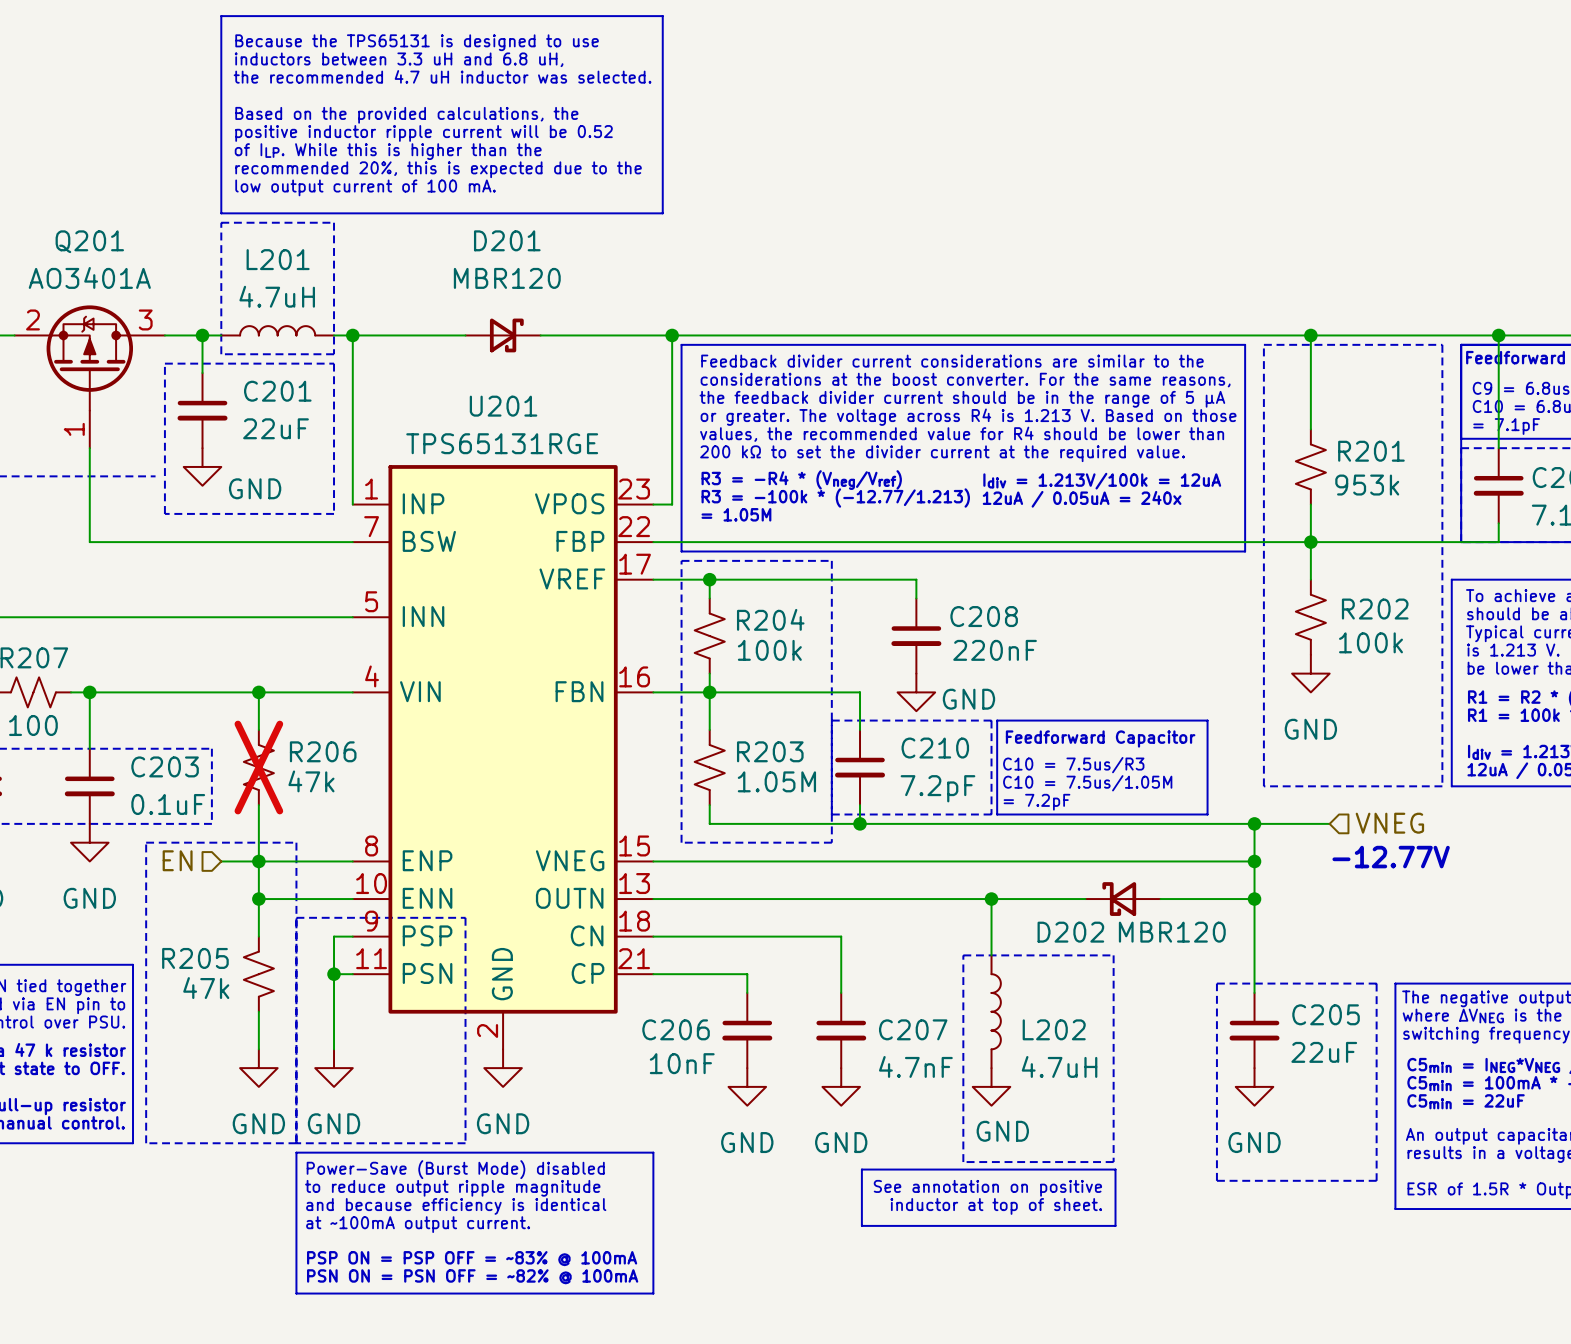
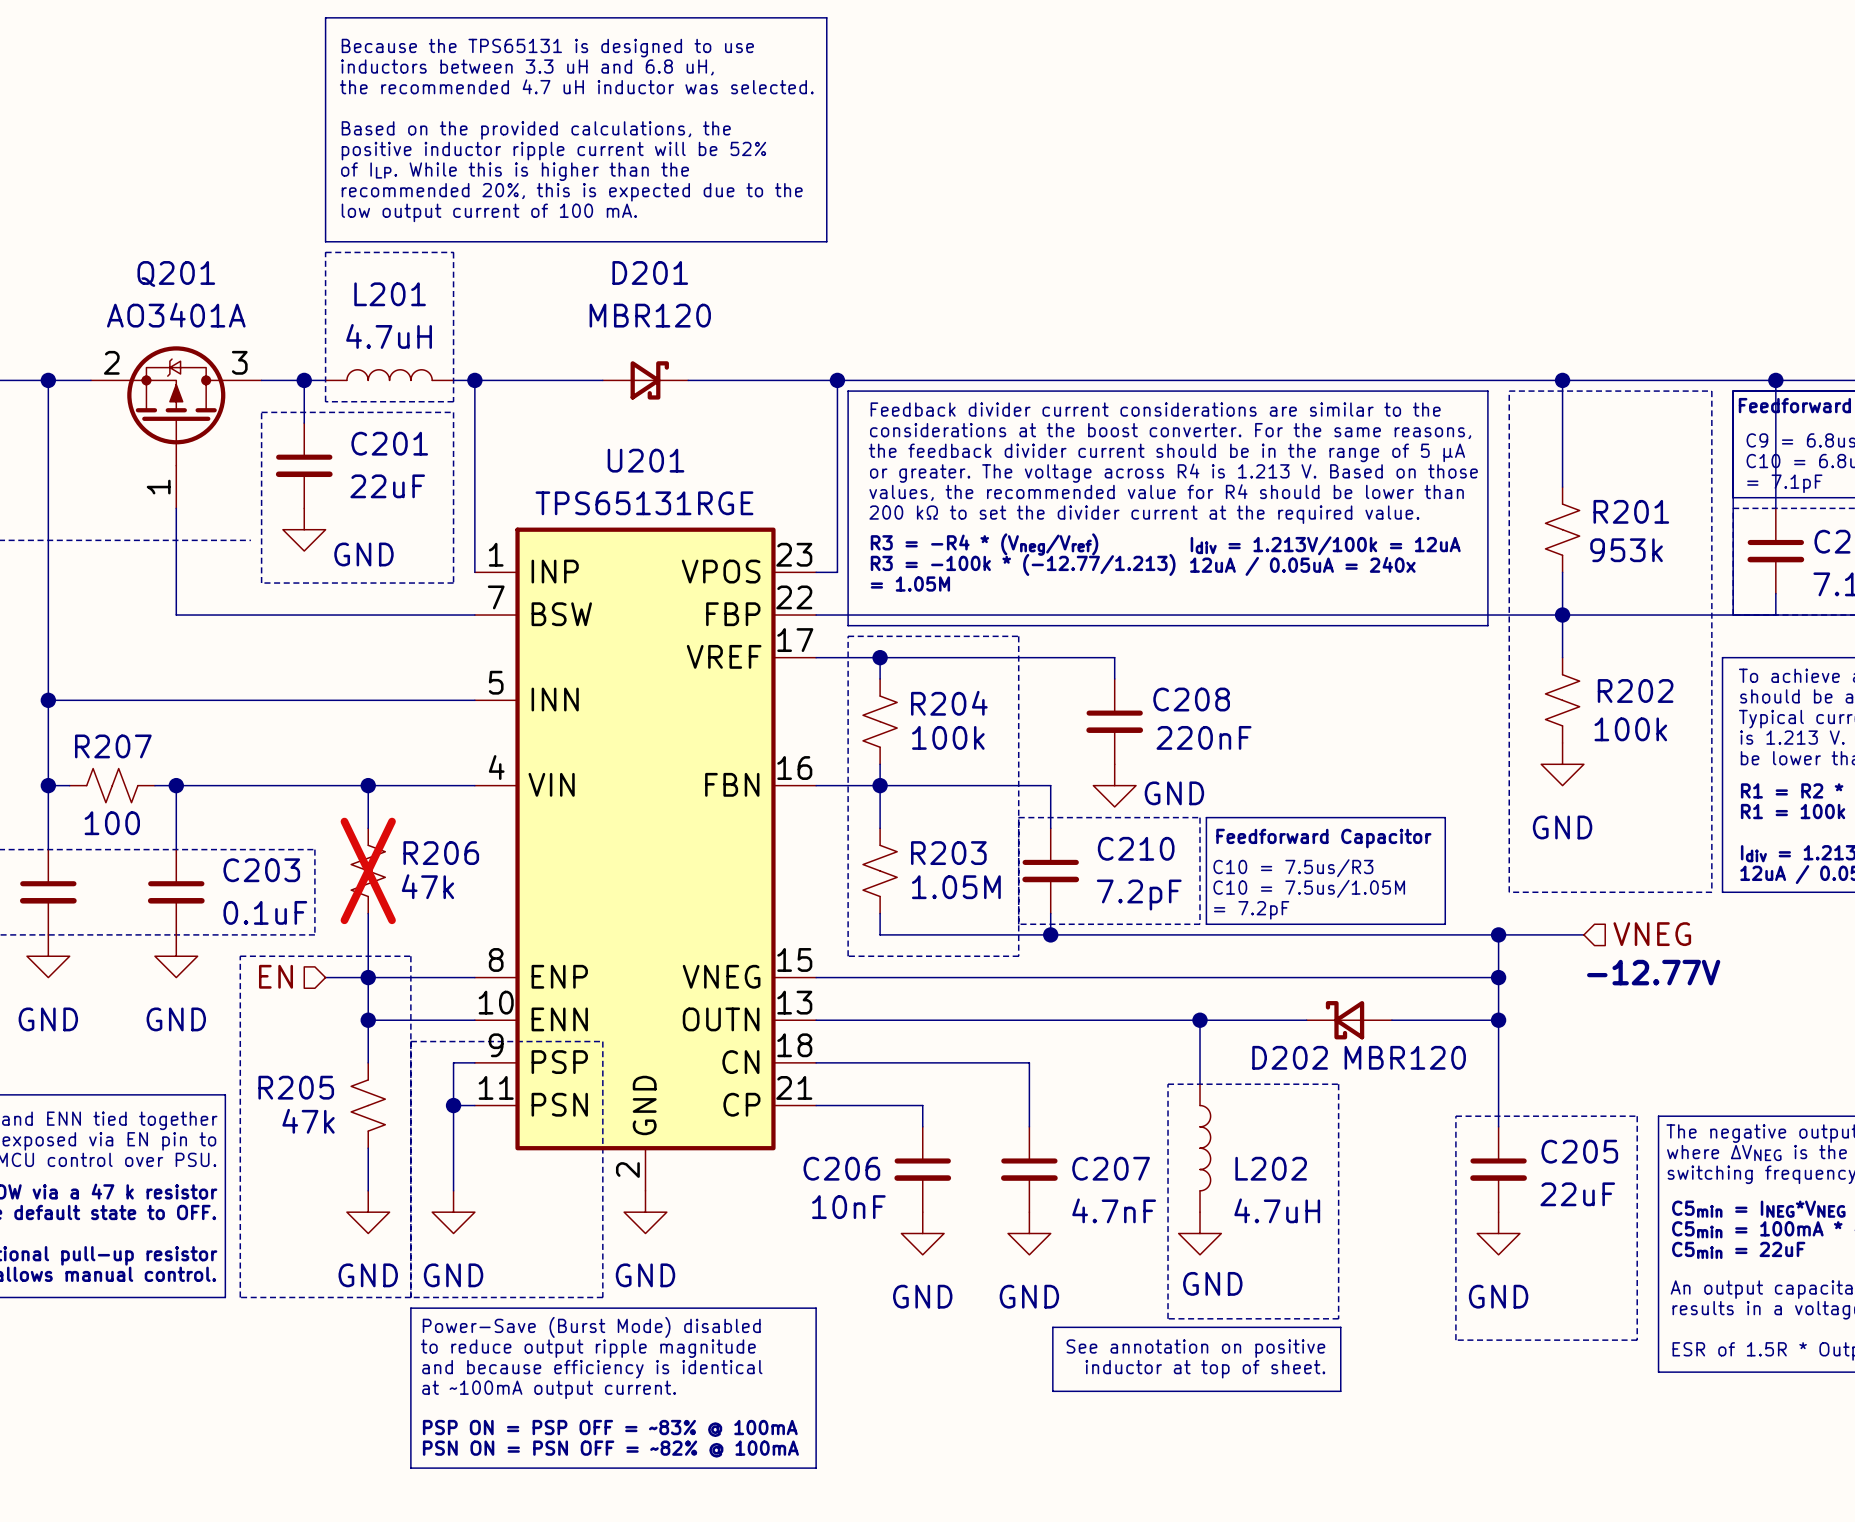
text: positive inductor ripple current will be 0.52 (424, 133) -> positive inductor ripple current will be 52% (553, 151)

